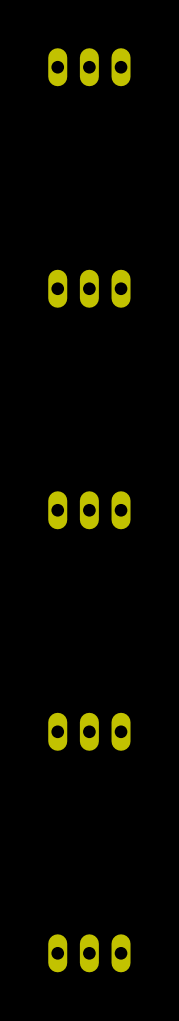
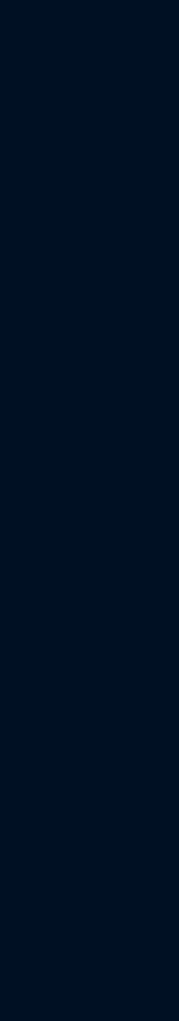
part: (89, 67) -> none
part: (89, 288) -> none
part: (89, 510) -> none
part: (89, 731) -> none
part: (89, 953) -> none

